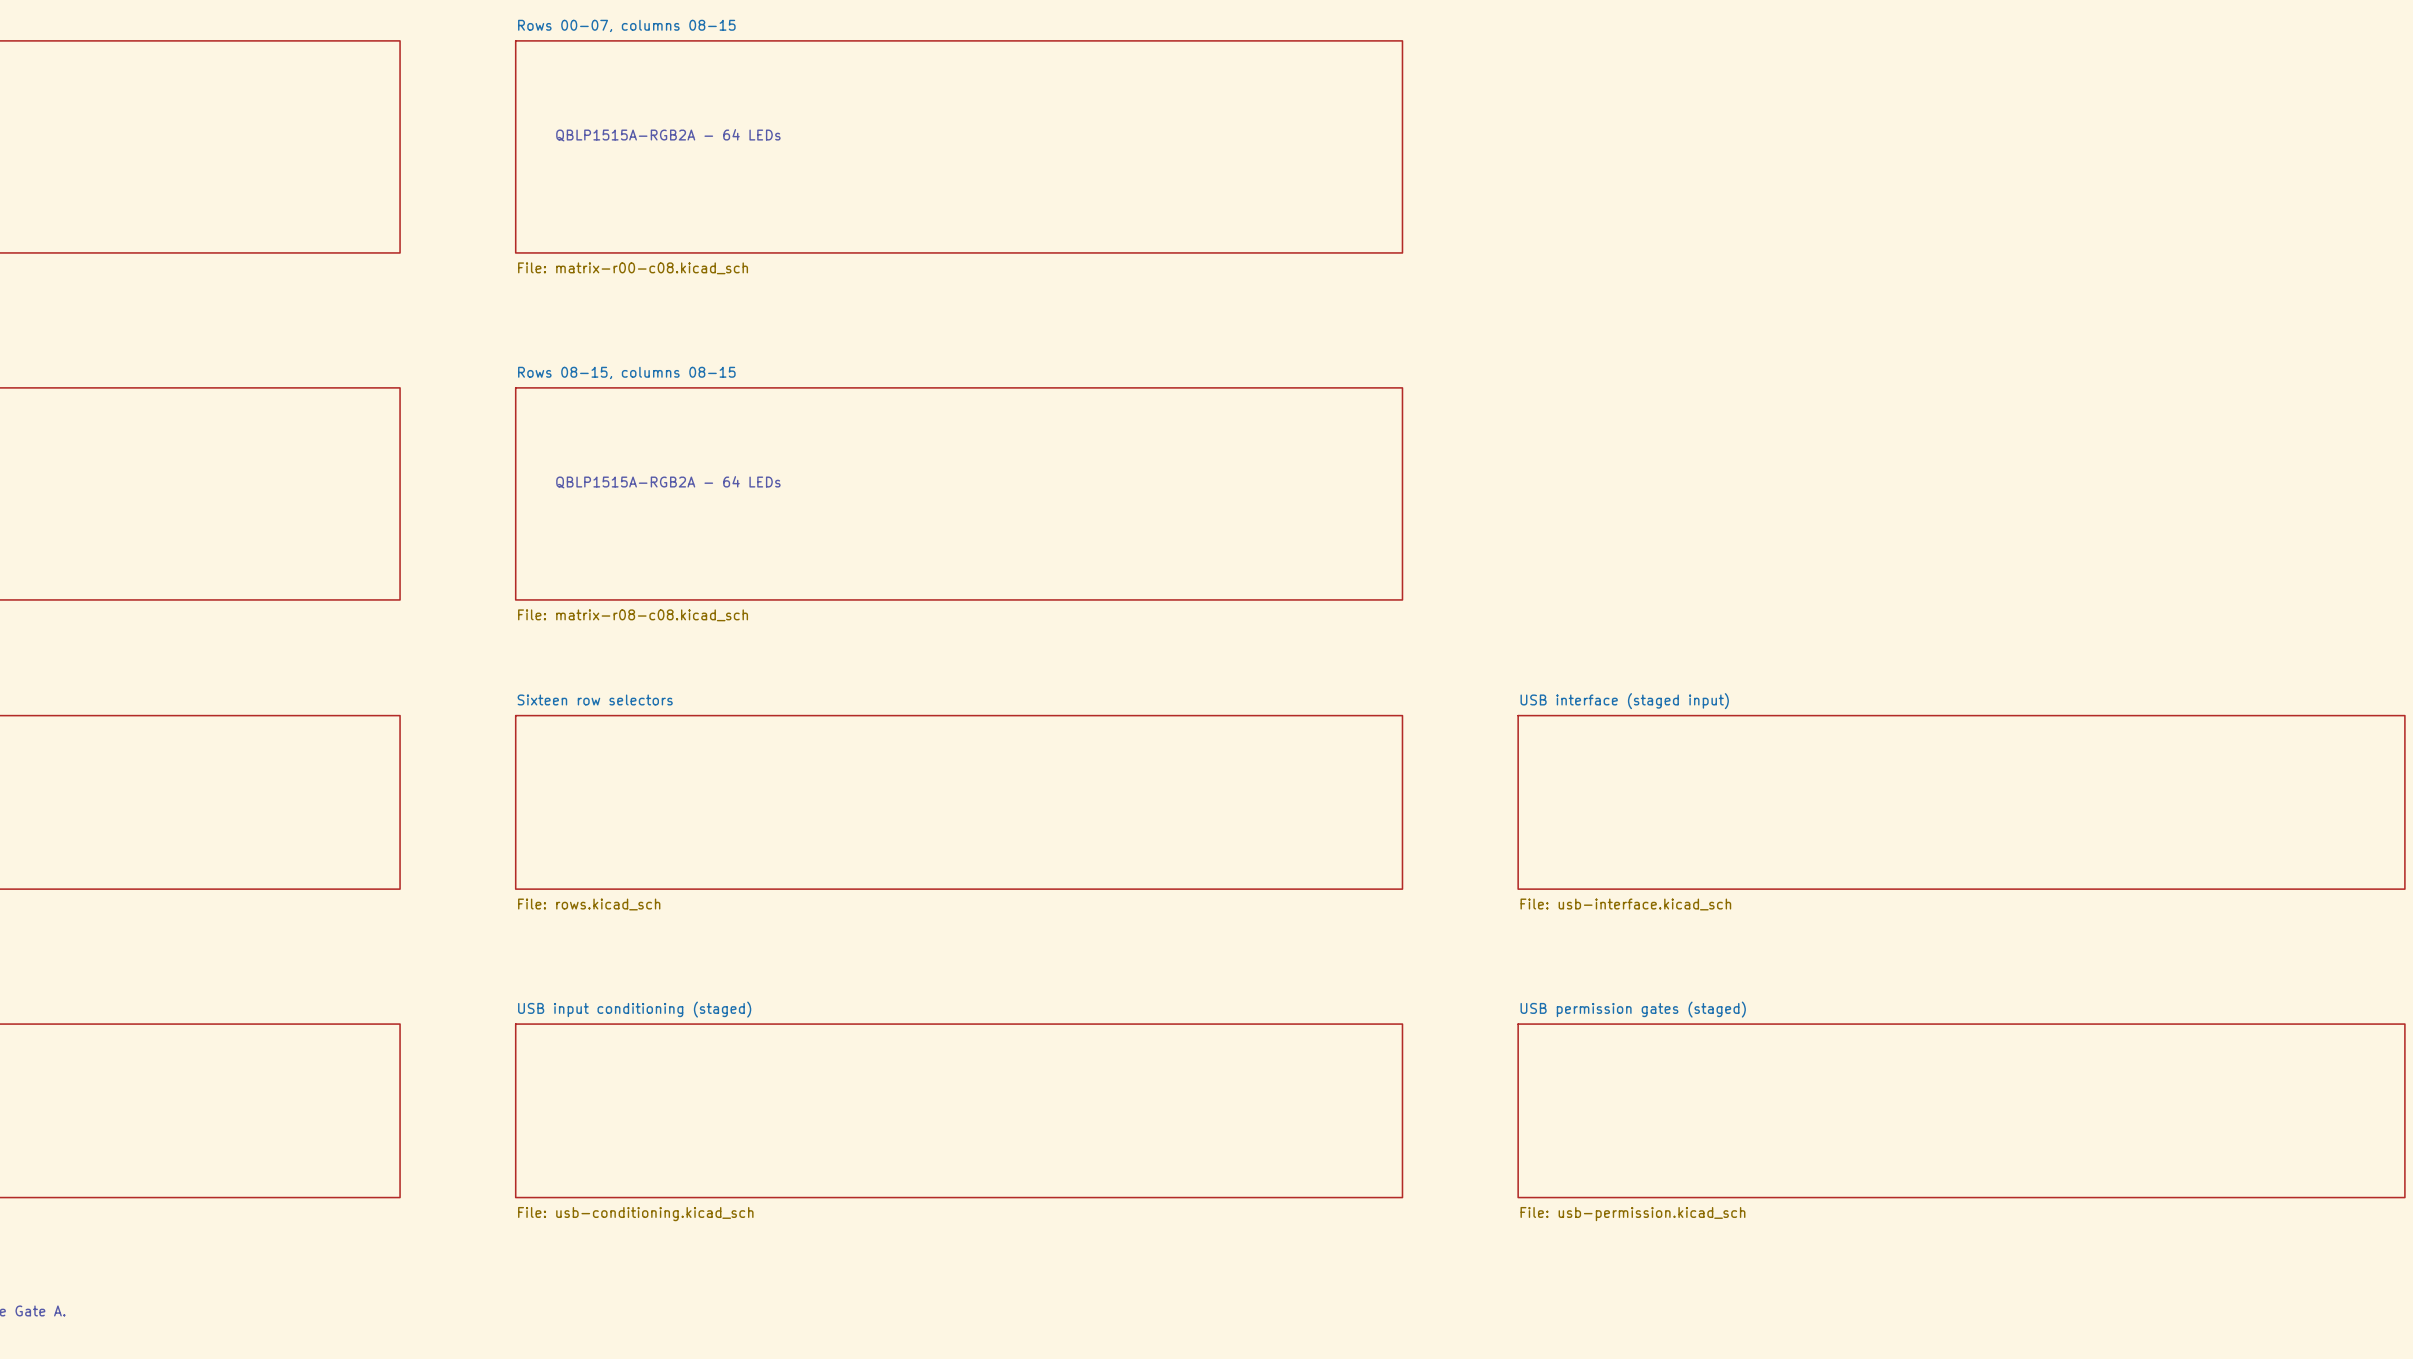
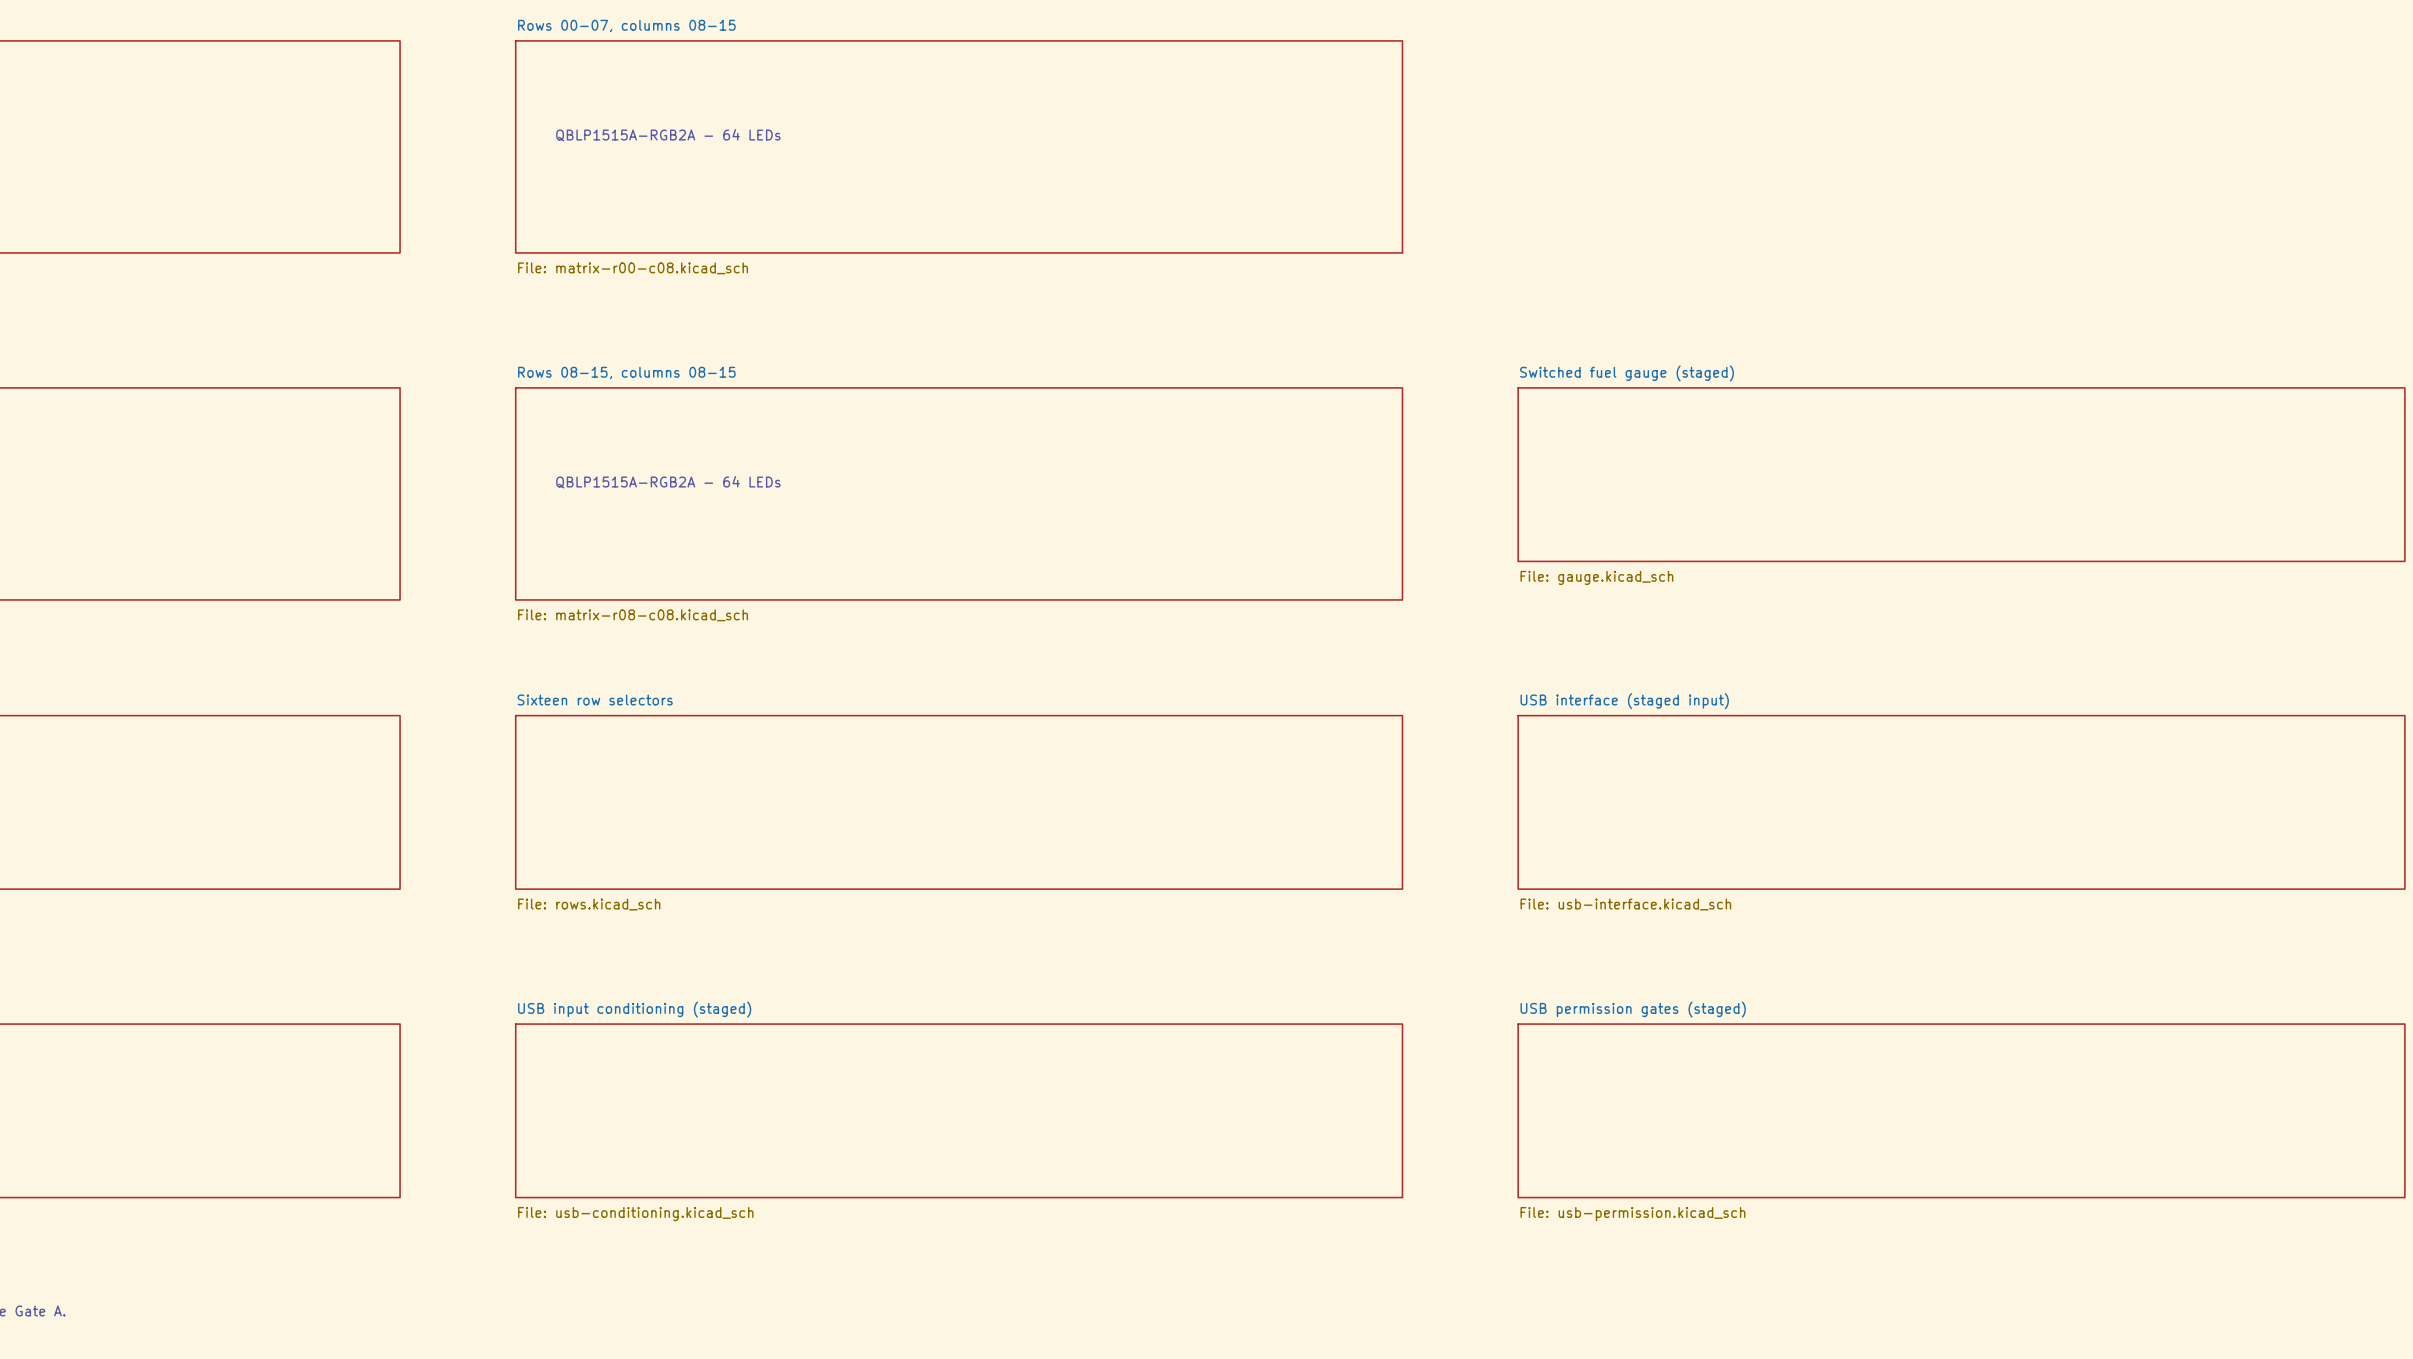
sheet Switched fuel gauge (staged): none -> File: gauge.kicad_sch (1961, 474)

